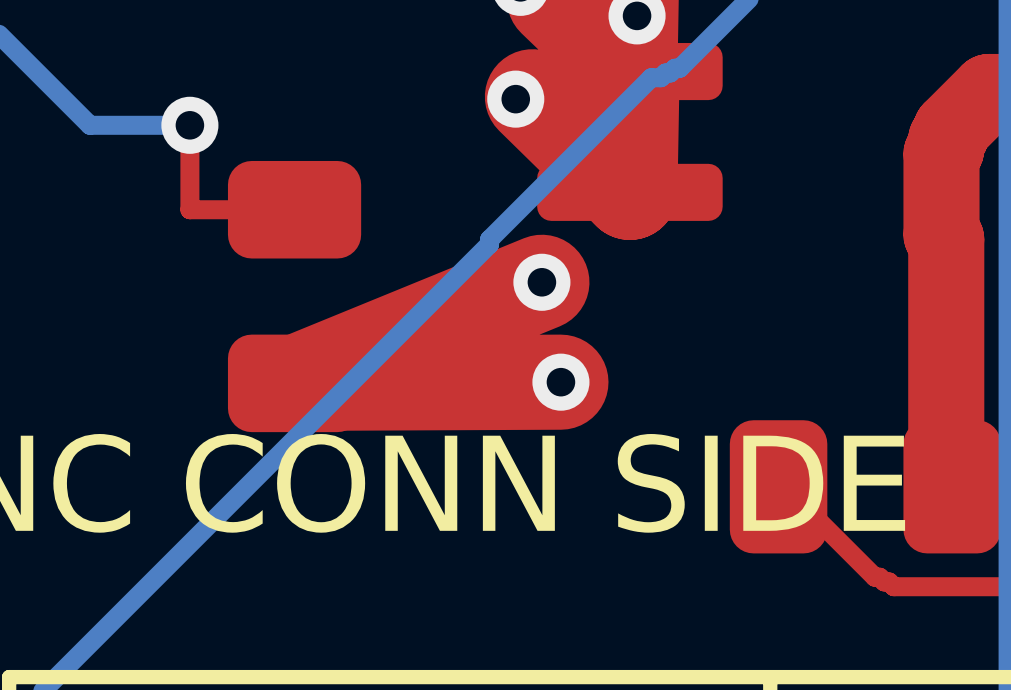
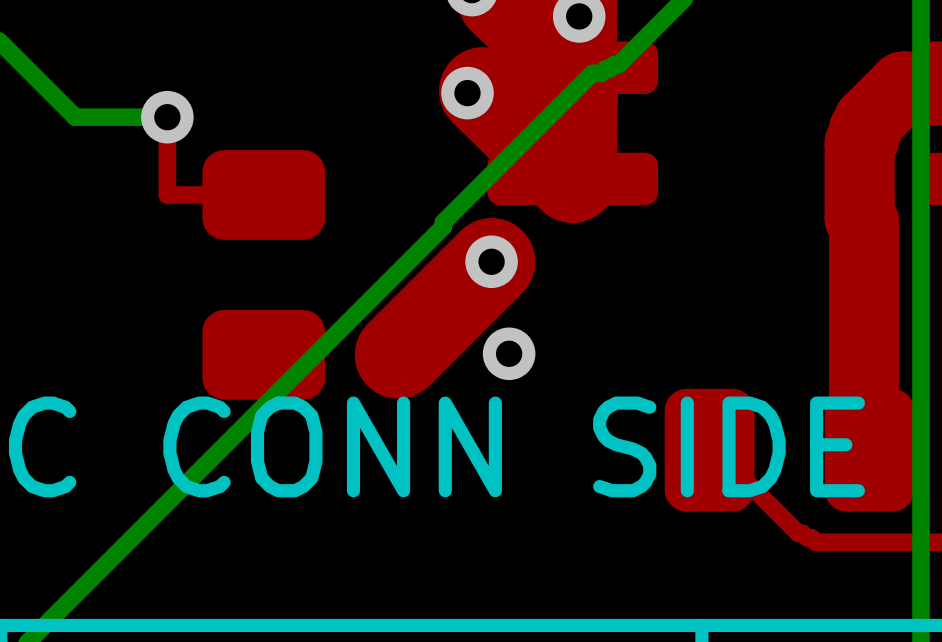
top track: (541, 282) (294, 383) (560, 382) -> (491, 261) (398, 354)

